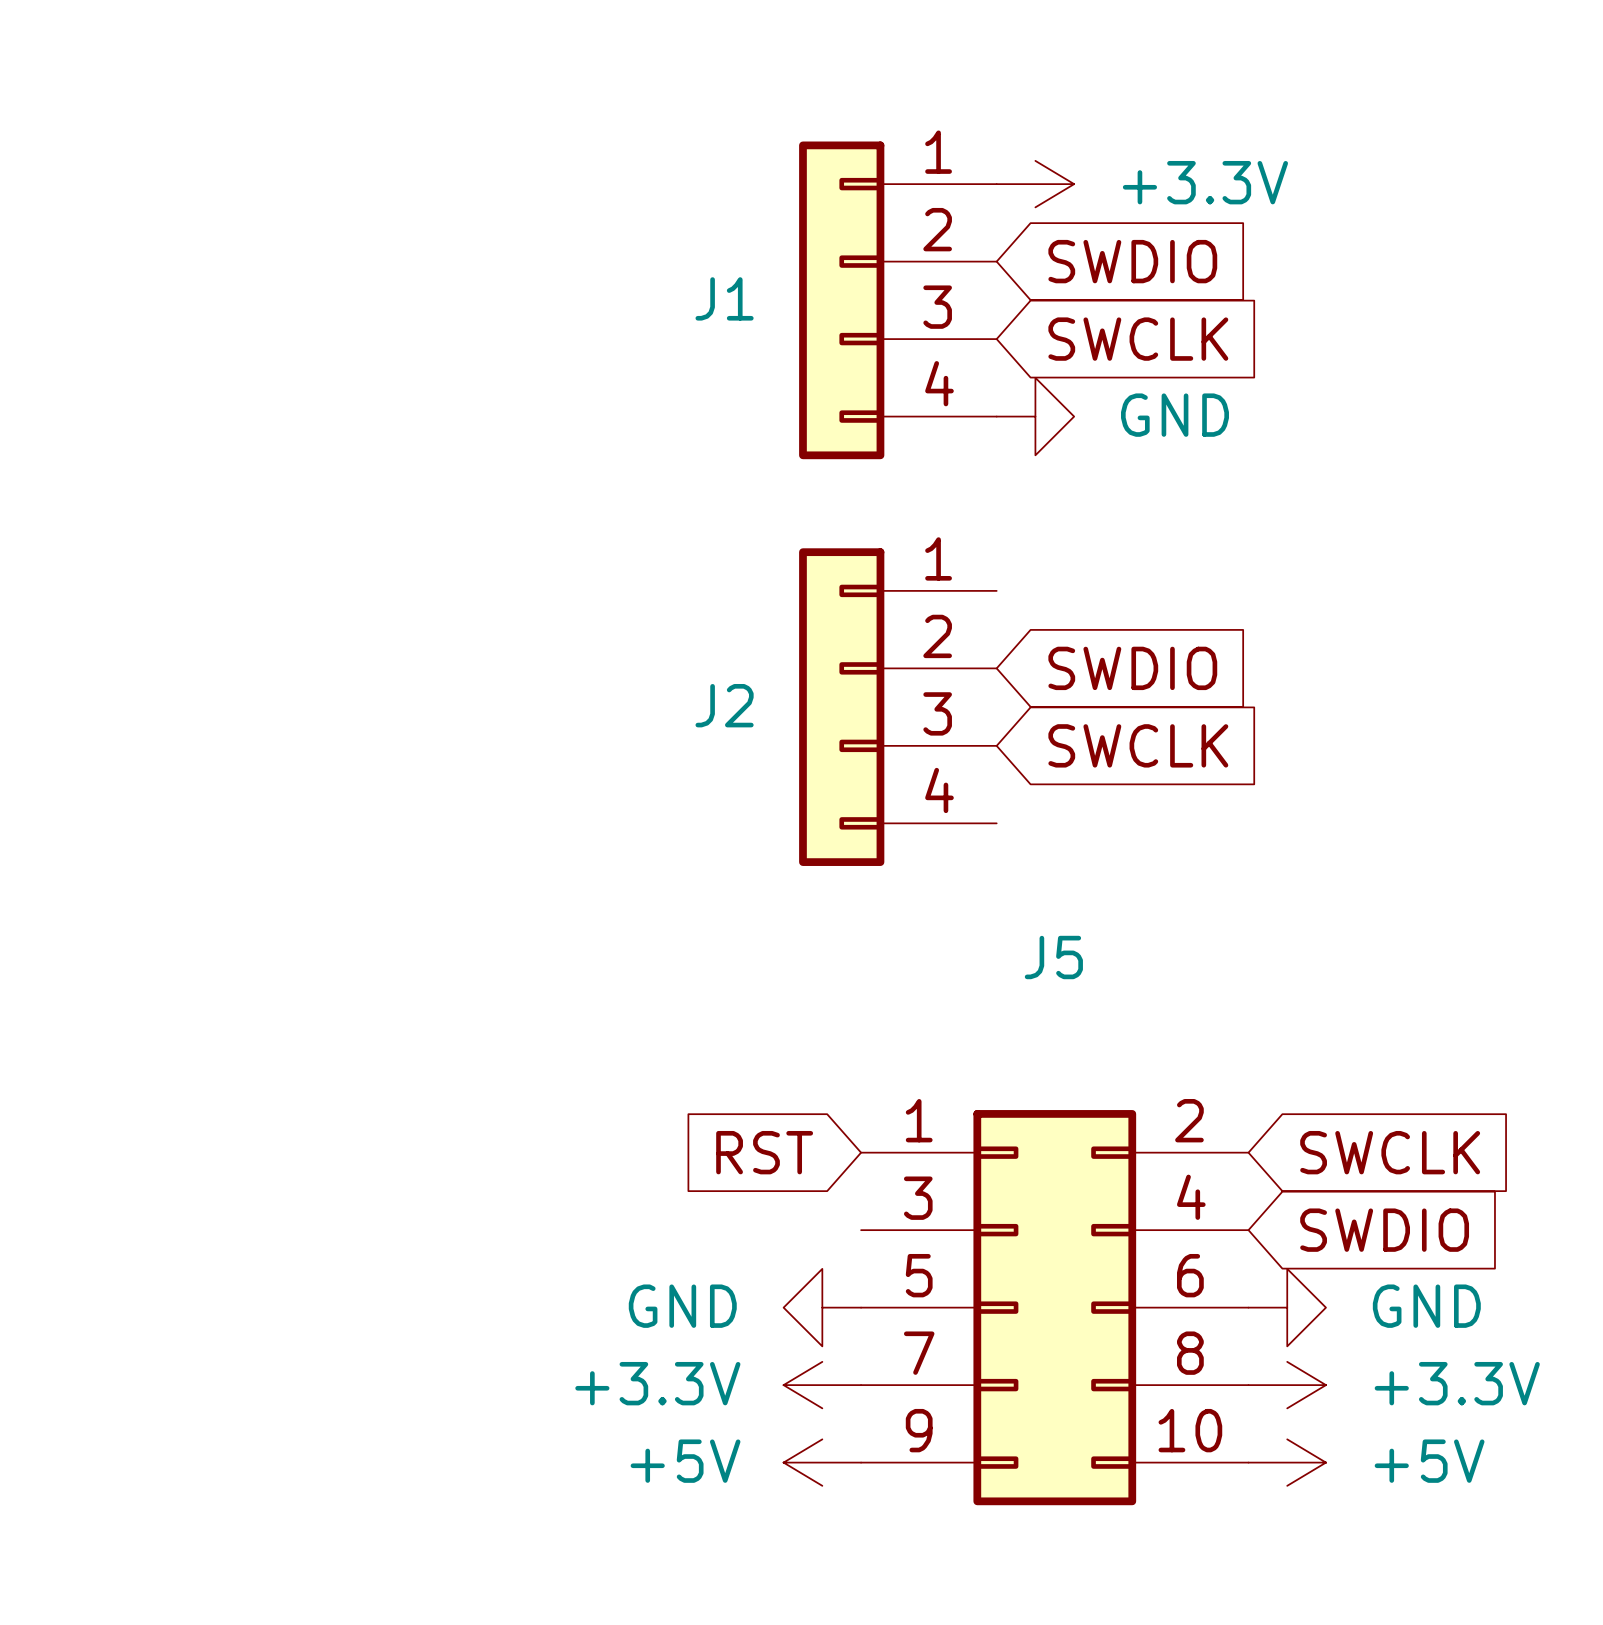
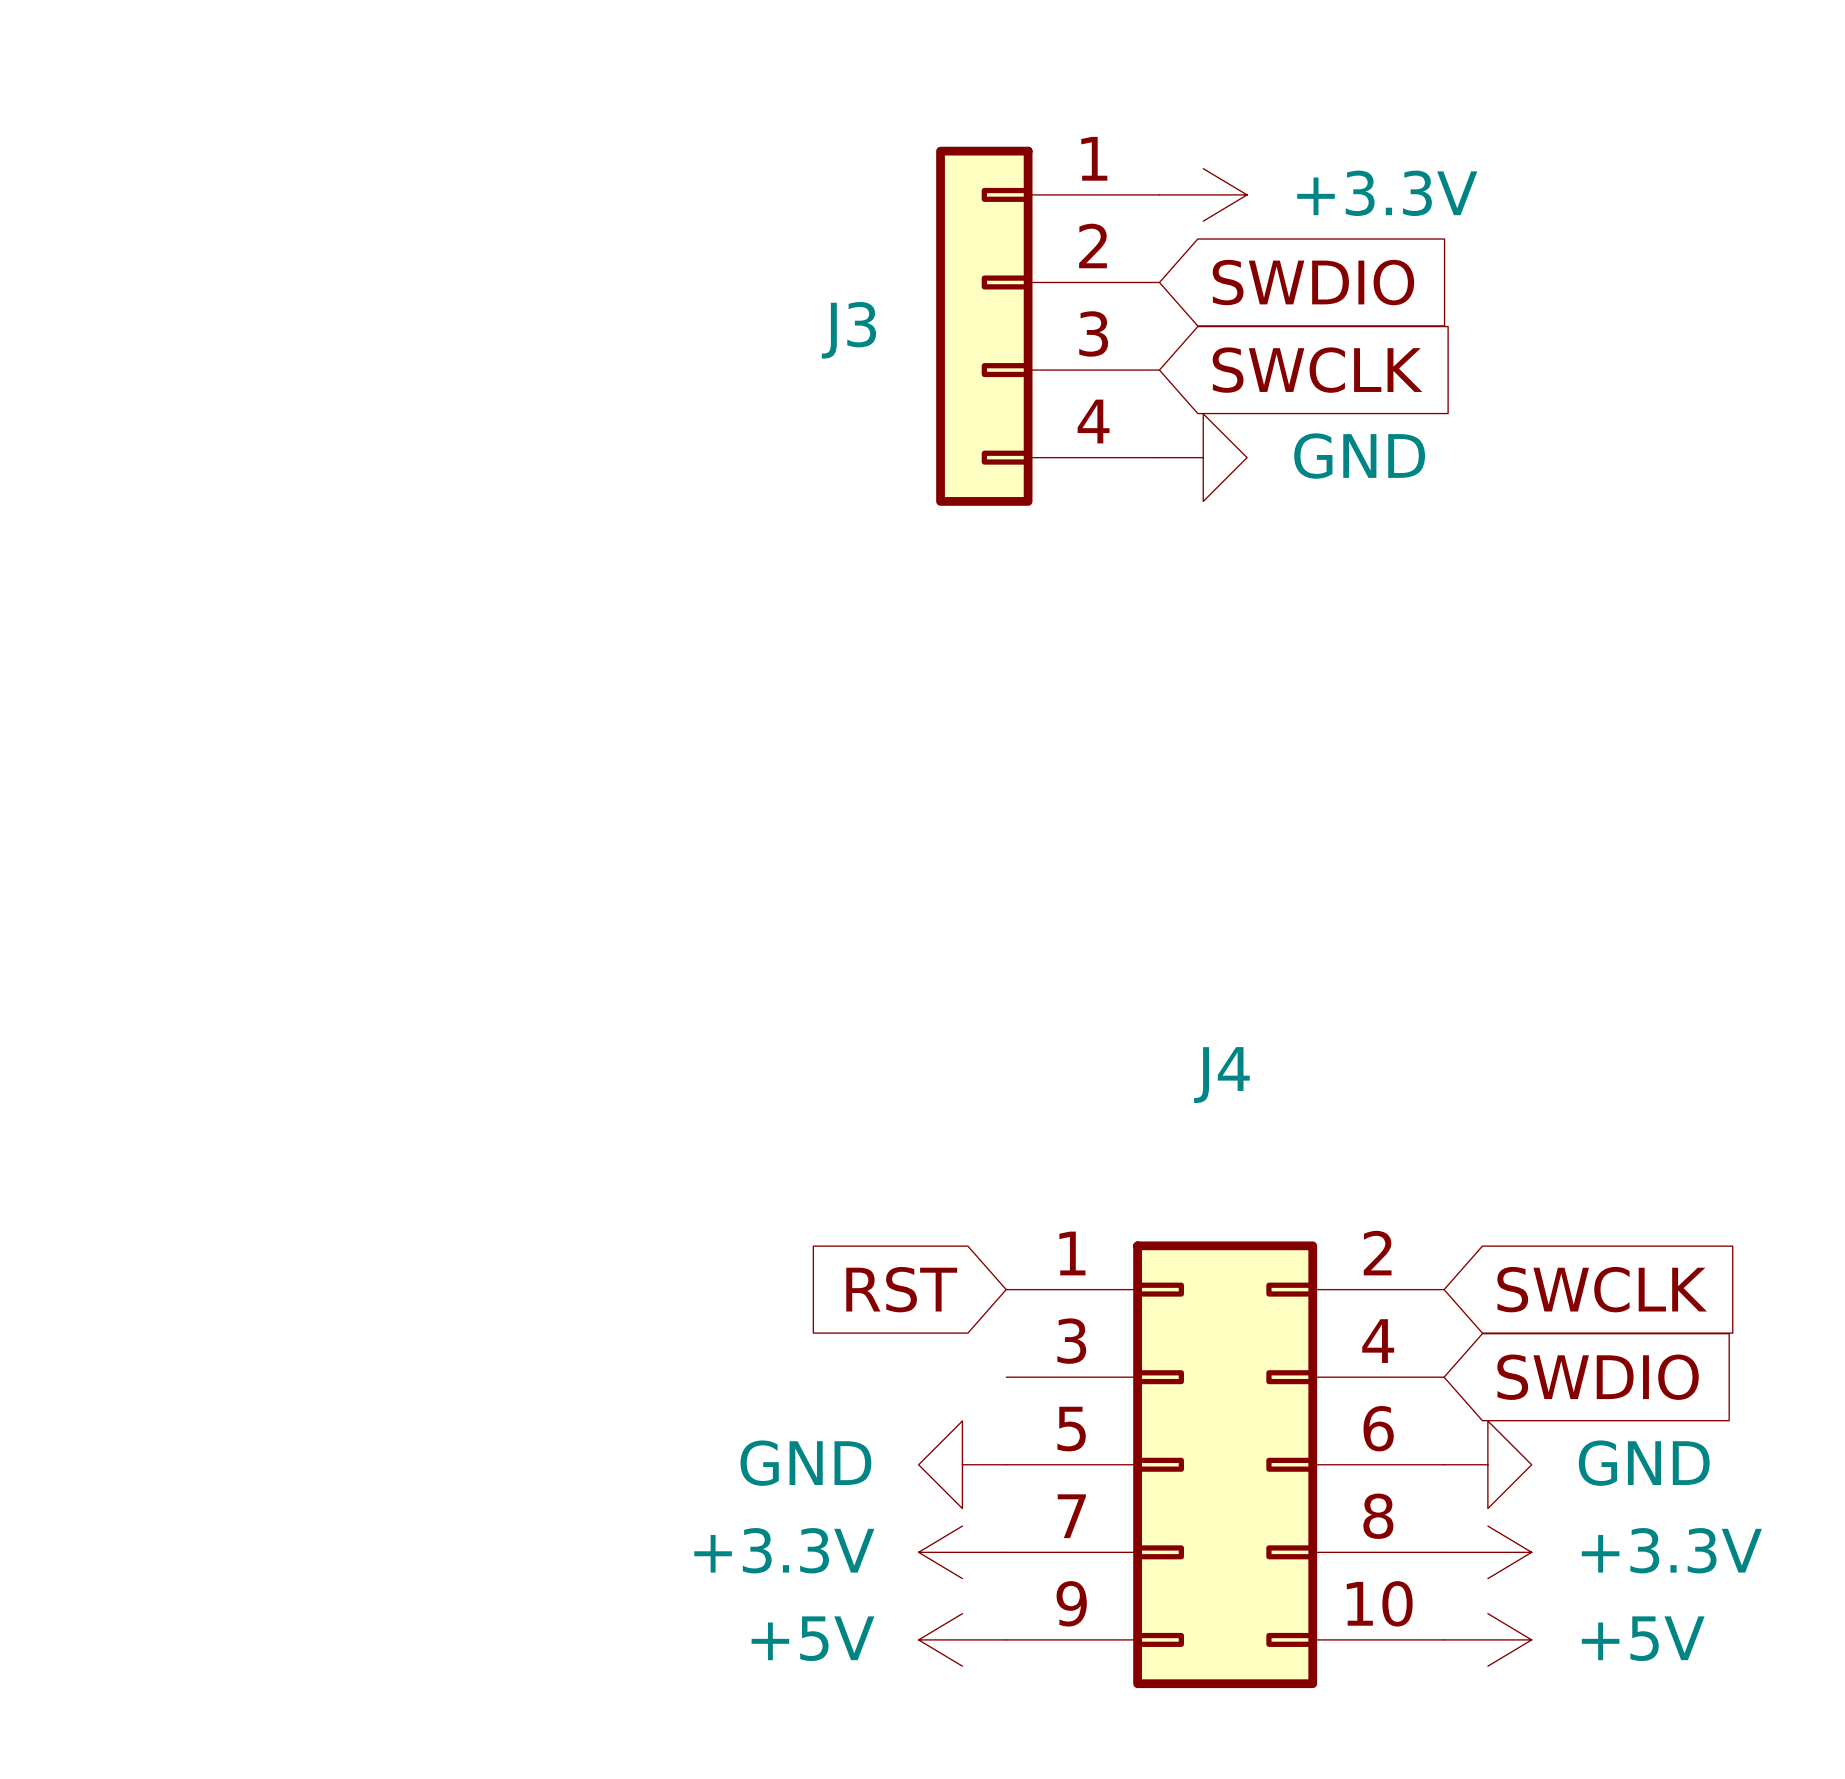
J1 name: J1 (724, 298) -> J3 (849, 330)
global label: SWDIO (1132, 668) -> none
J2: (897, 707) -> none
global label: SWCLK (1138, 745) -> none
J5 name: J5 (1053, 957) -> J4 (1221, 1075)

